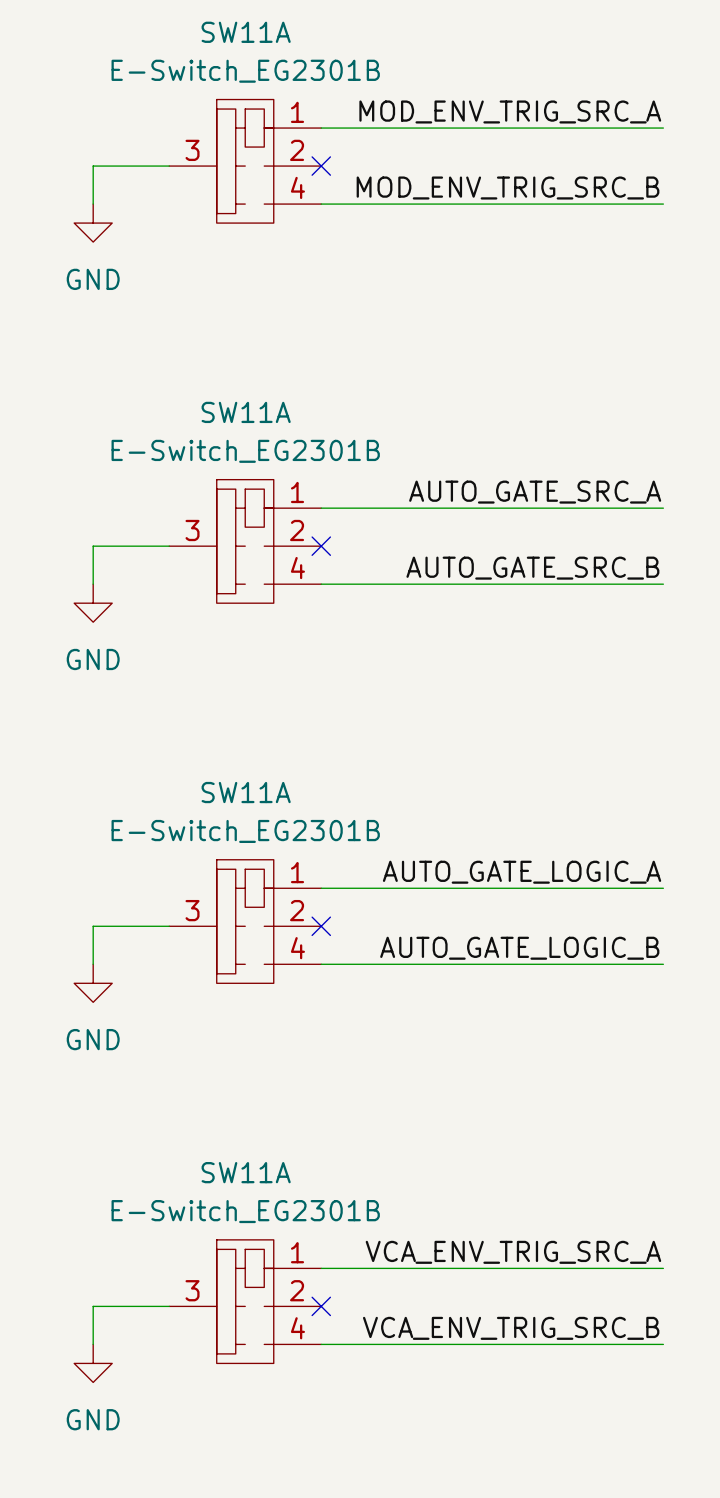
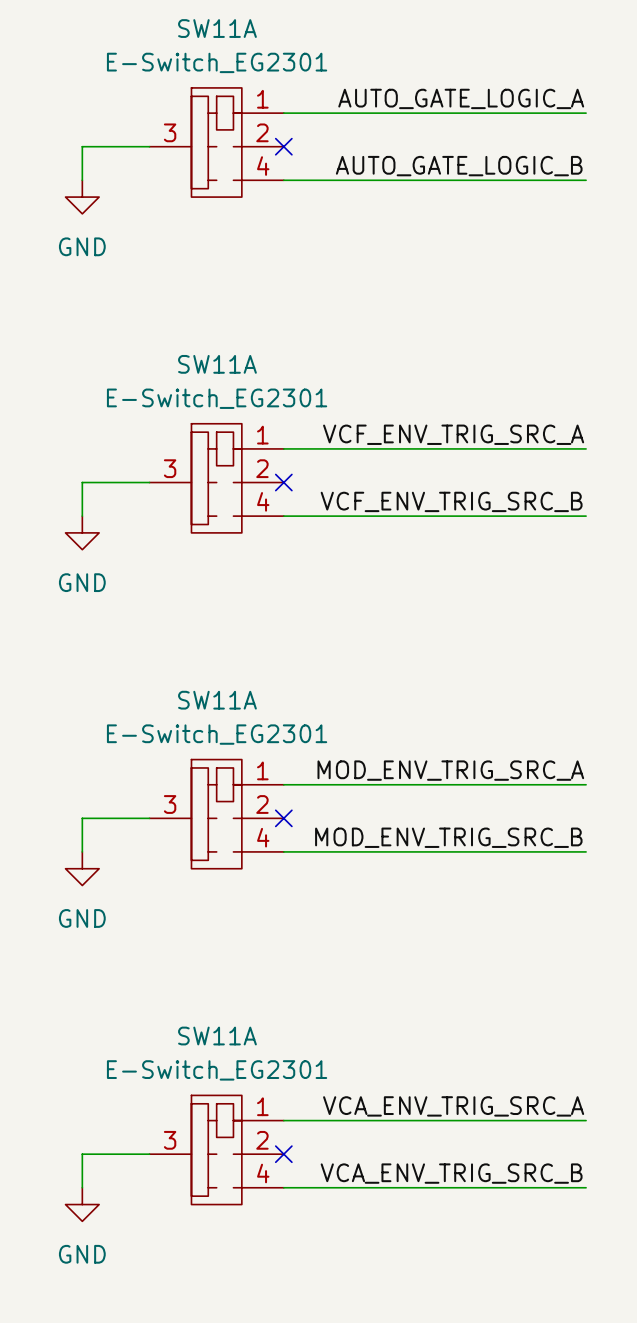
SW11A value: E-Switch_EG2301B (245, 71) -> E-Switch_EG2301 (217, 62)
label: MOD_ENV_TRIG_SRC_A (510, 111) -> AUTO_GATE_LOGIC_A (461, 98)
label: MOD_ENV_TRIG_SRC_B (508, 188) -> AUTO_GATE_LOGIC_B (459, 166)
SW11A value: E-Switch_EG2301B (245, 451) -> E-Switch_EG2301 (217, 398)
label: AUTO_GATE_SRC_A (535, 492) -> VCF_ENV_TRIG_SRC_A (453, 434)
label: AUTO_GATE_SRC_B (532, 568) -> VCF_ENV_TRIG_SRC_B (451, 501)
SW11A value: E-Switch_EG2301B (245, 831) -> E-Switch_EG2301 (217, 734)
label: AUTO_GATE_LOGIC_A (522, 872) -> MOD_ENV_TRIG_SRC_A (450, 770)
label: AUTO_GATE_LOGIC_B (519, 948) -> MOD_ENV_TRIG_SRC_B (448, 837)
SW11A value: E-Switch_EG2301B (245, 1211) -> E-Switch_EG2301 (217, 1070)

